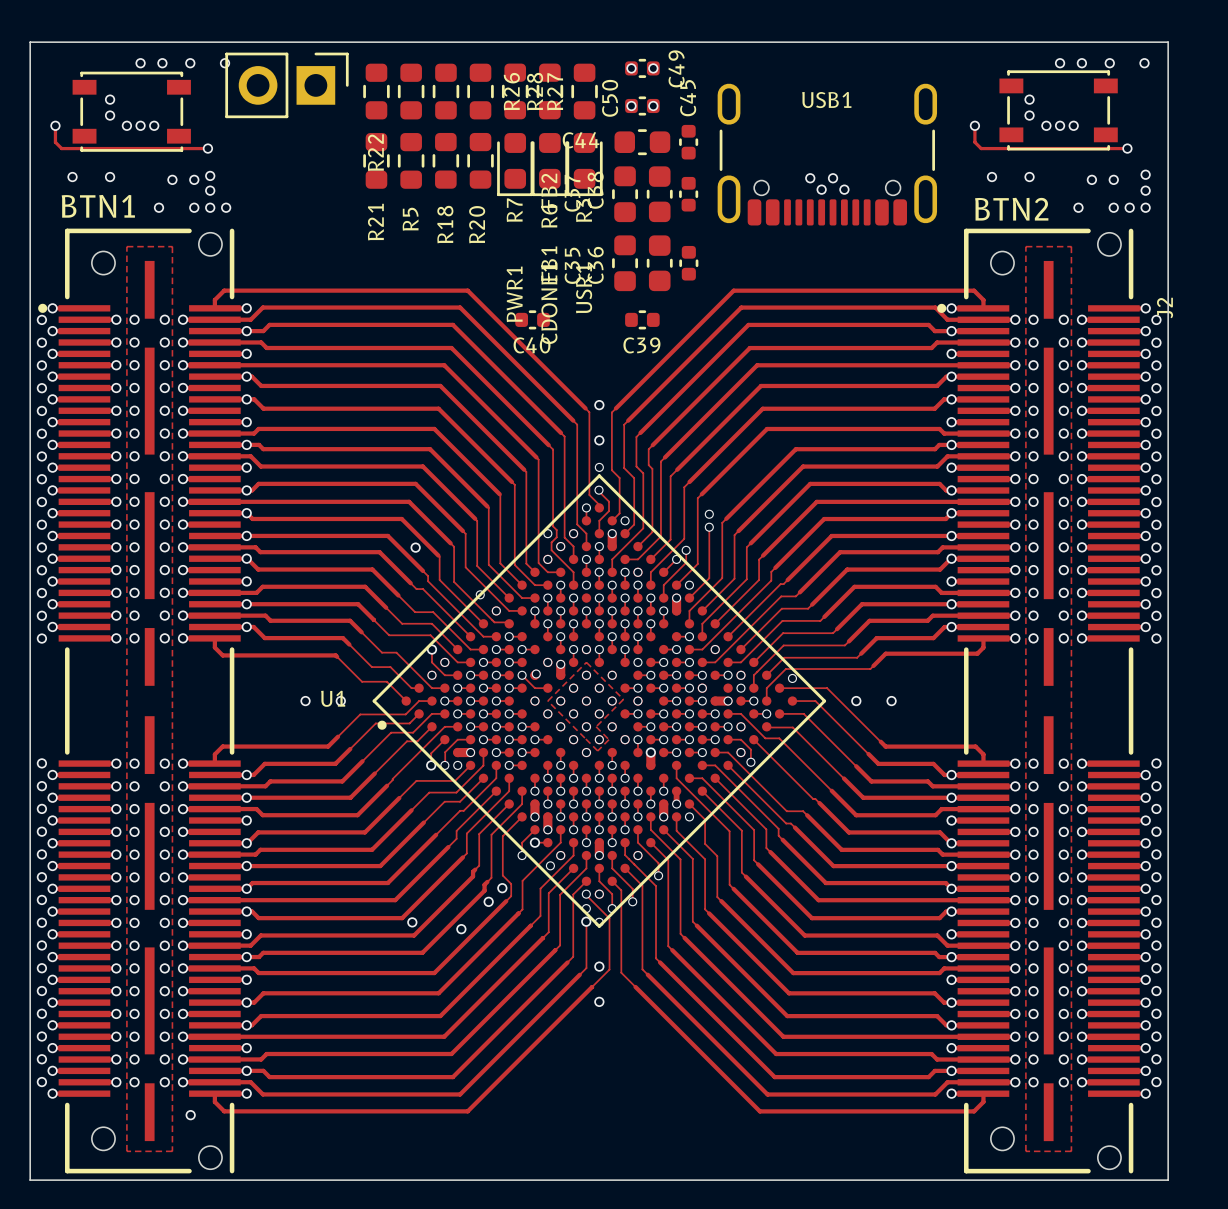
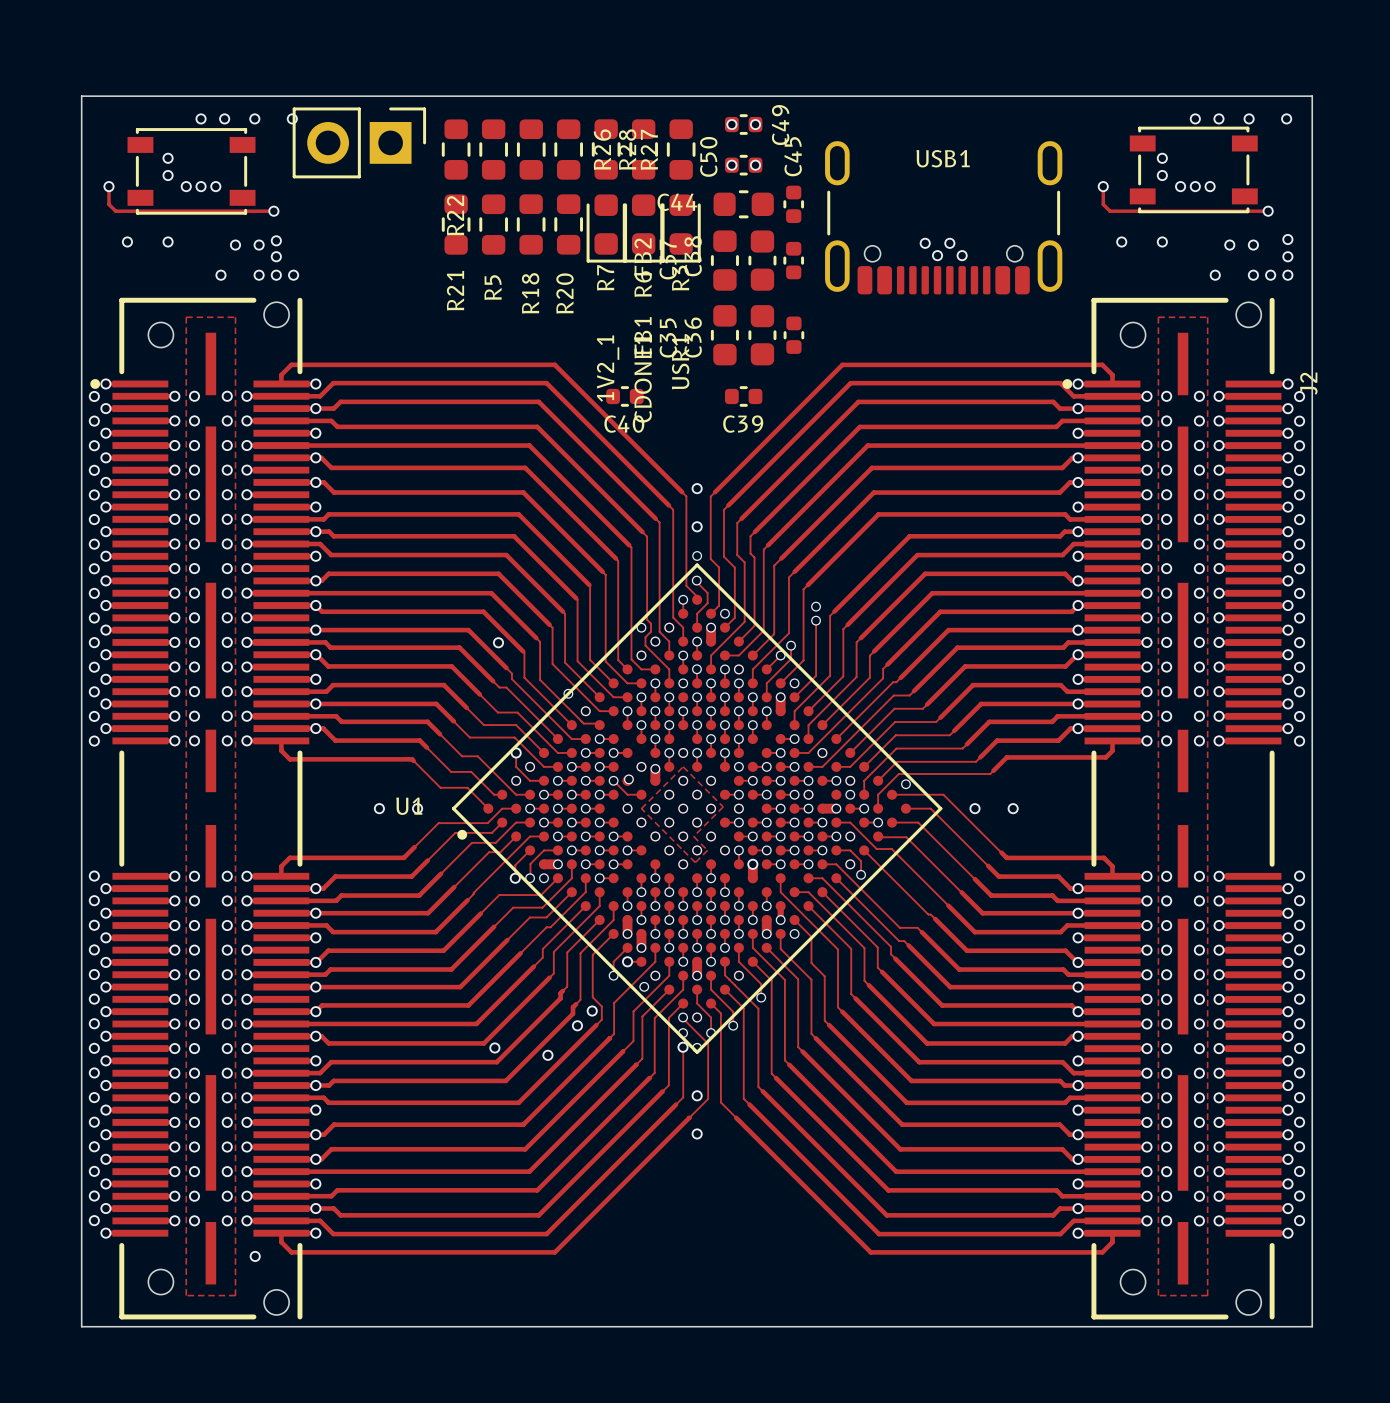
BTN1 name: BTN1 (98, 206) -> none
BTN2 name: BTN2 (1011, 209) -> none
PWR1 name: PWR1 (514, 294) -> 1V2_1 (608, 368)

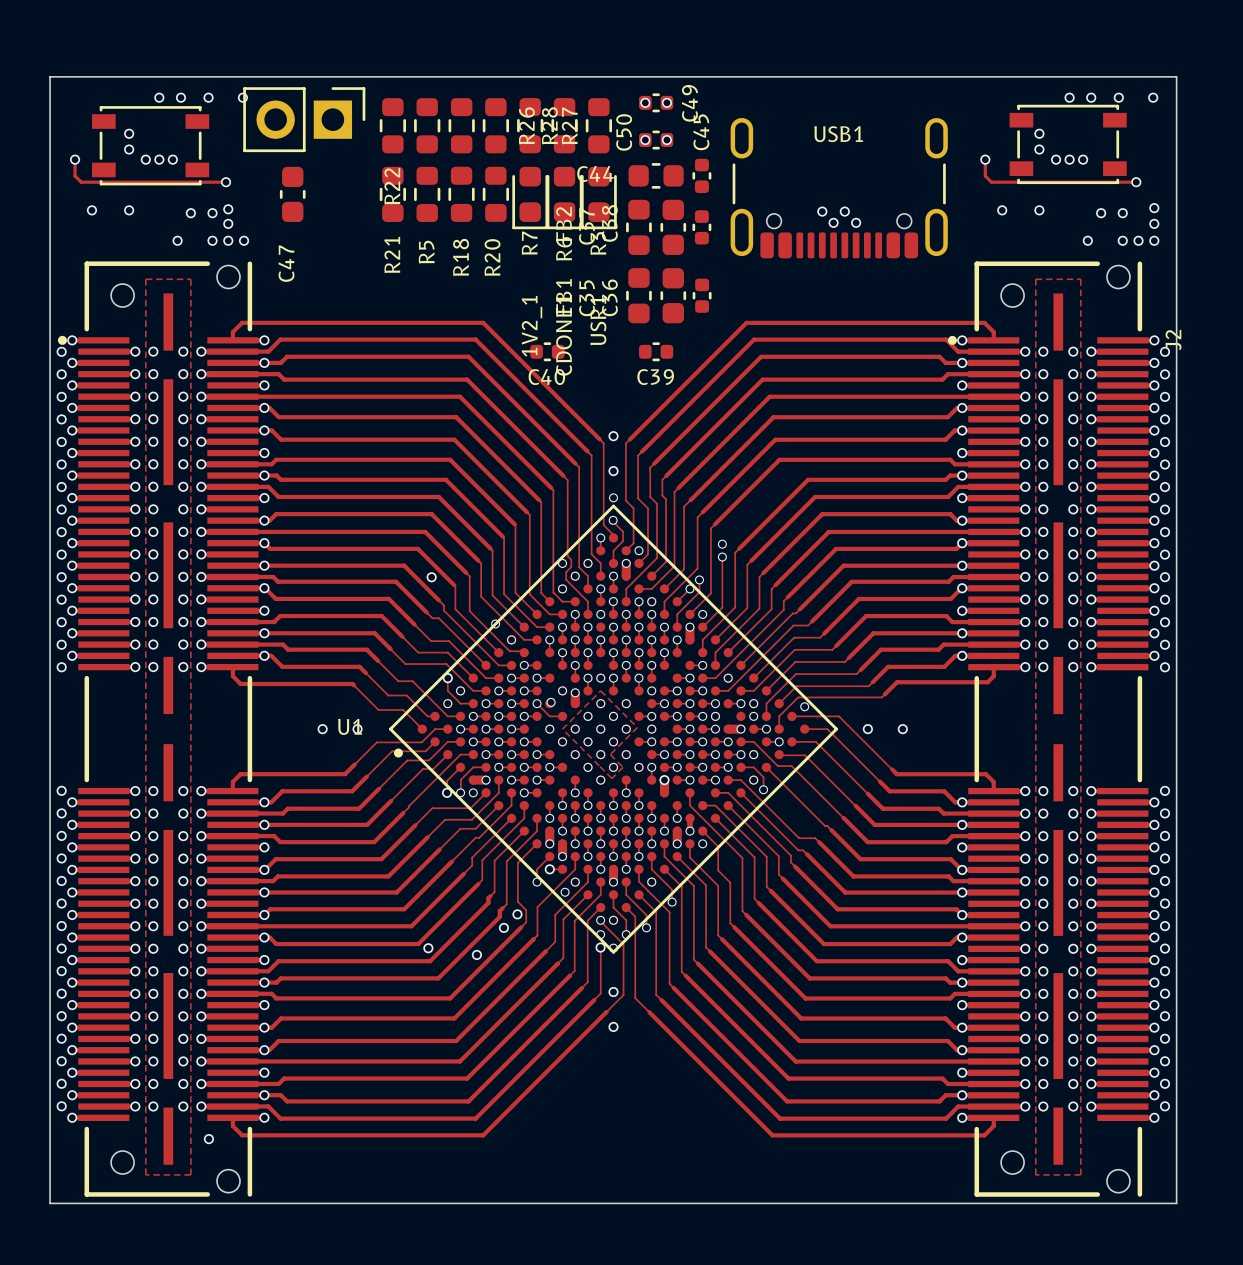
C47: none -> (292, 194)

